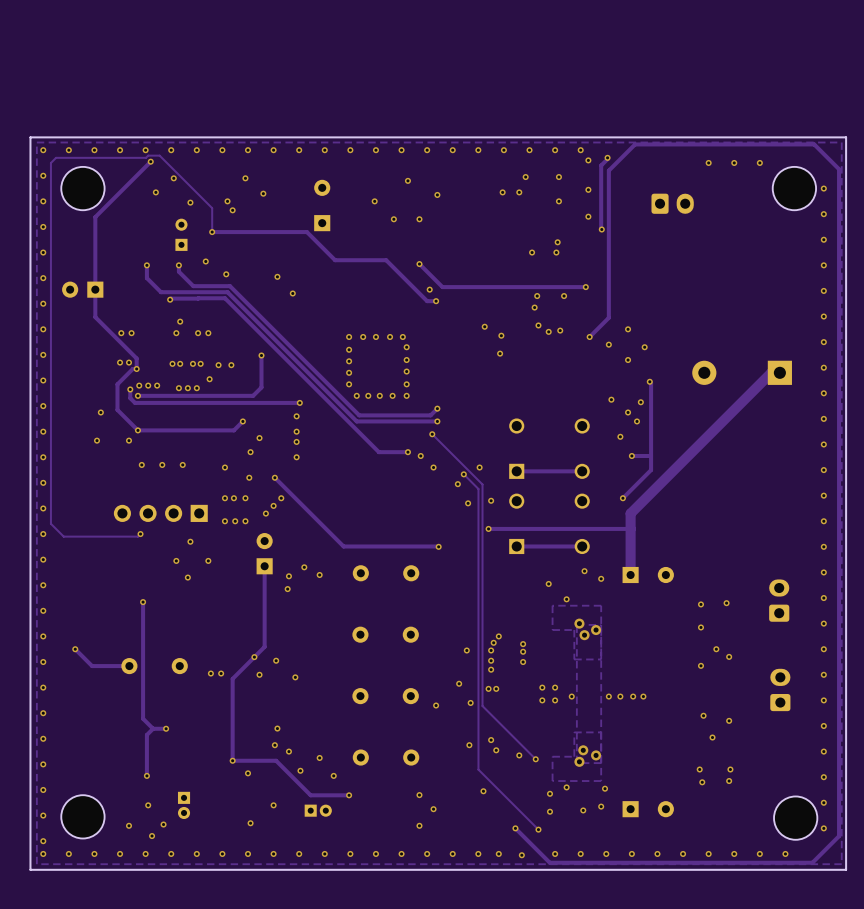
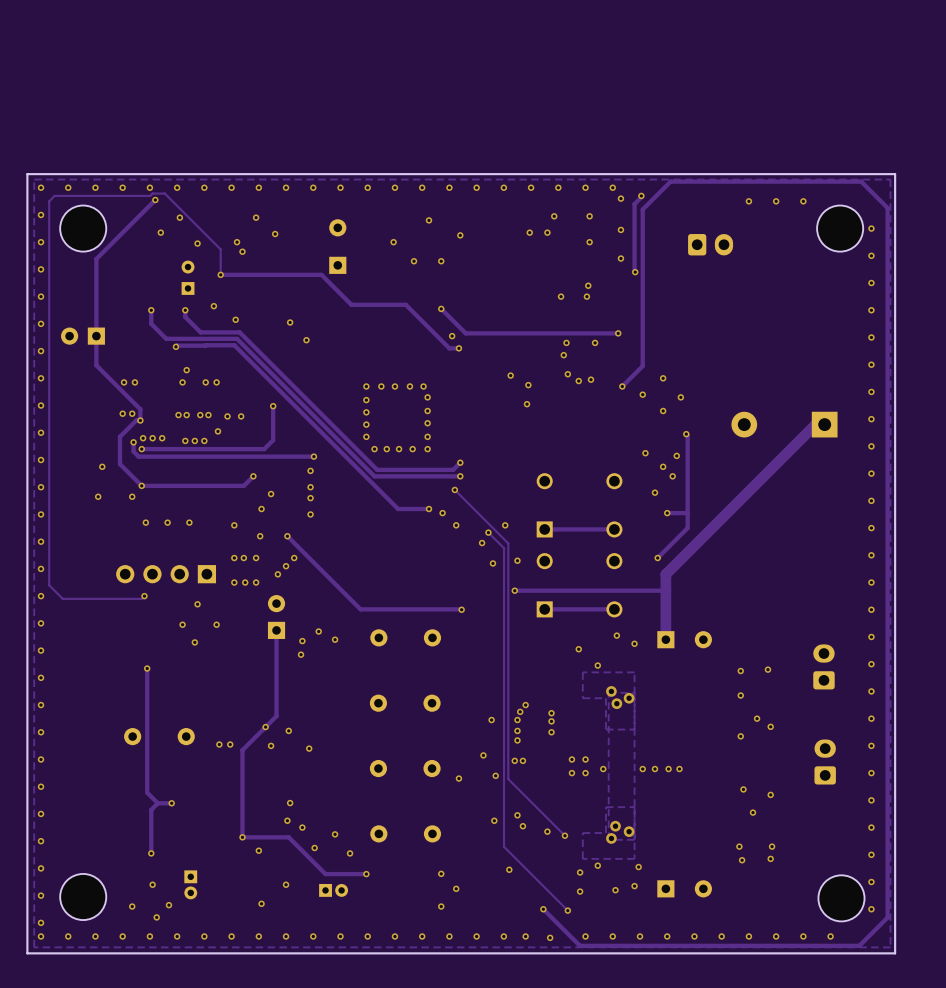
track: (75, 649) (92, 666) (129, 666) -> none
via: (75, 649) -> none

